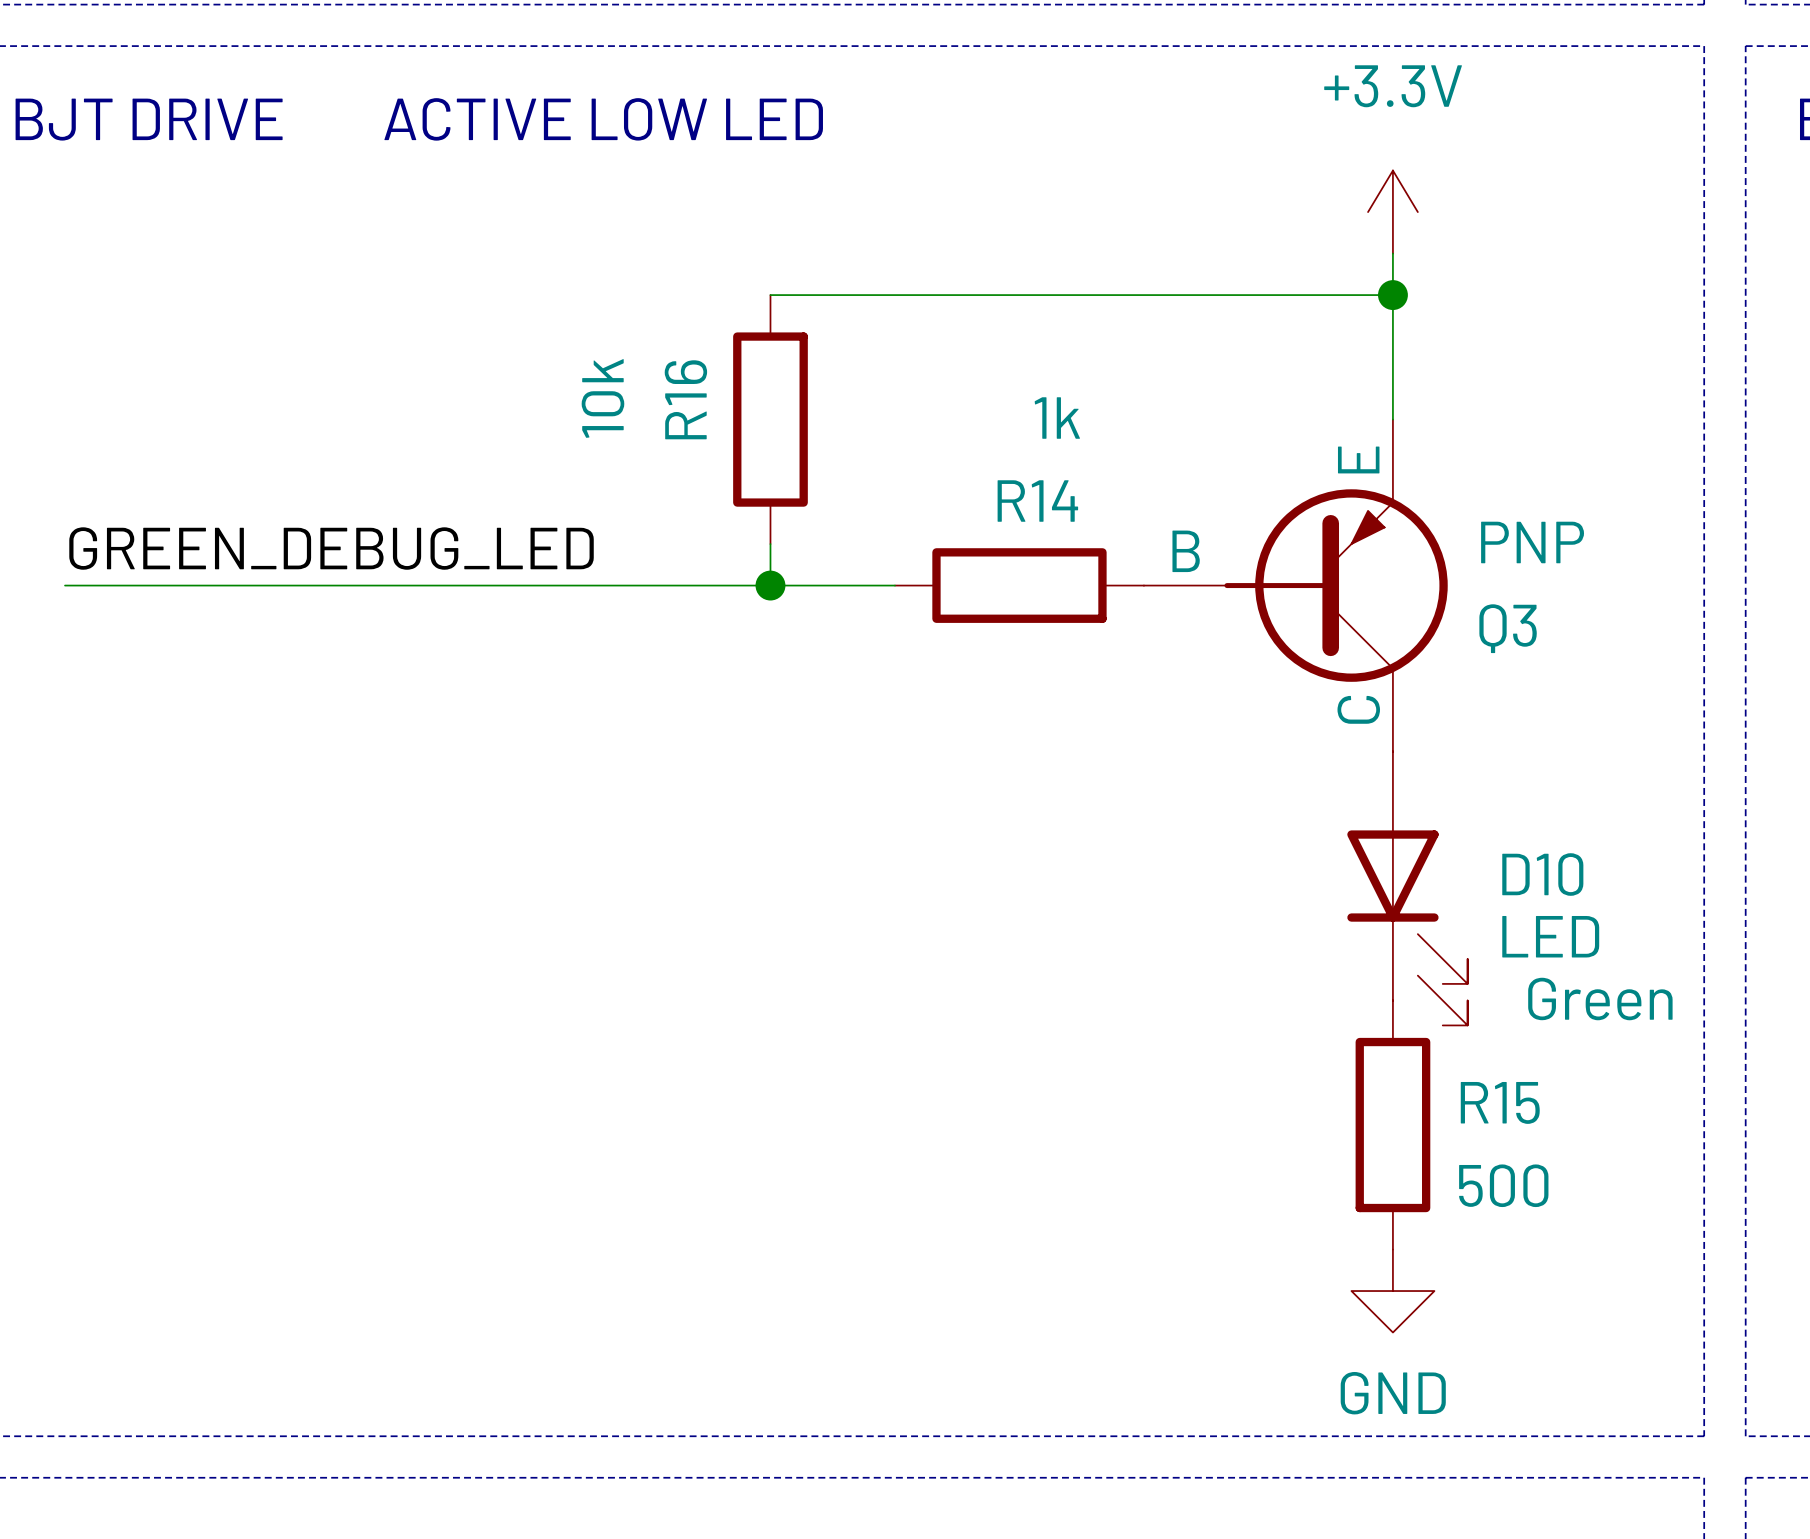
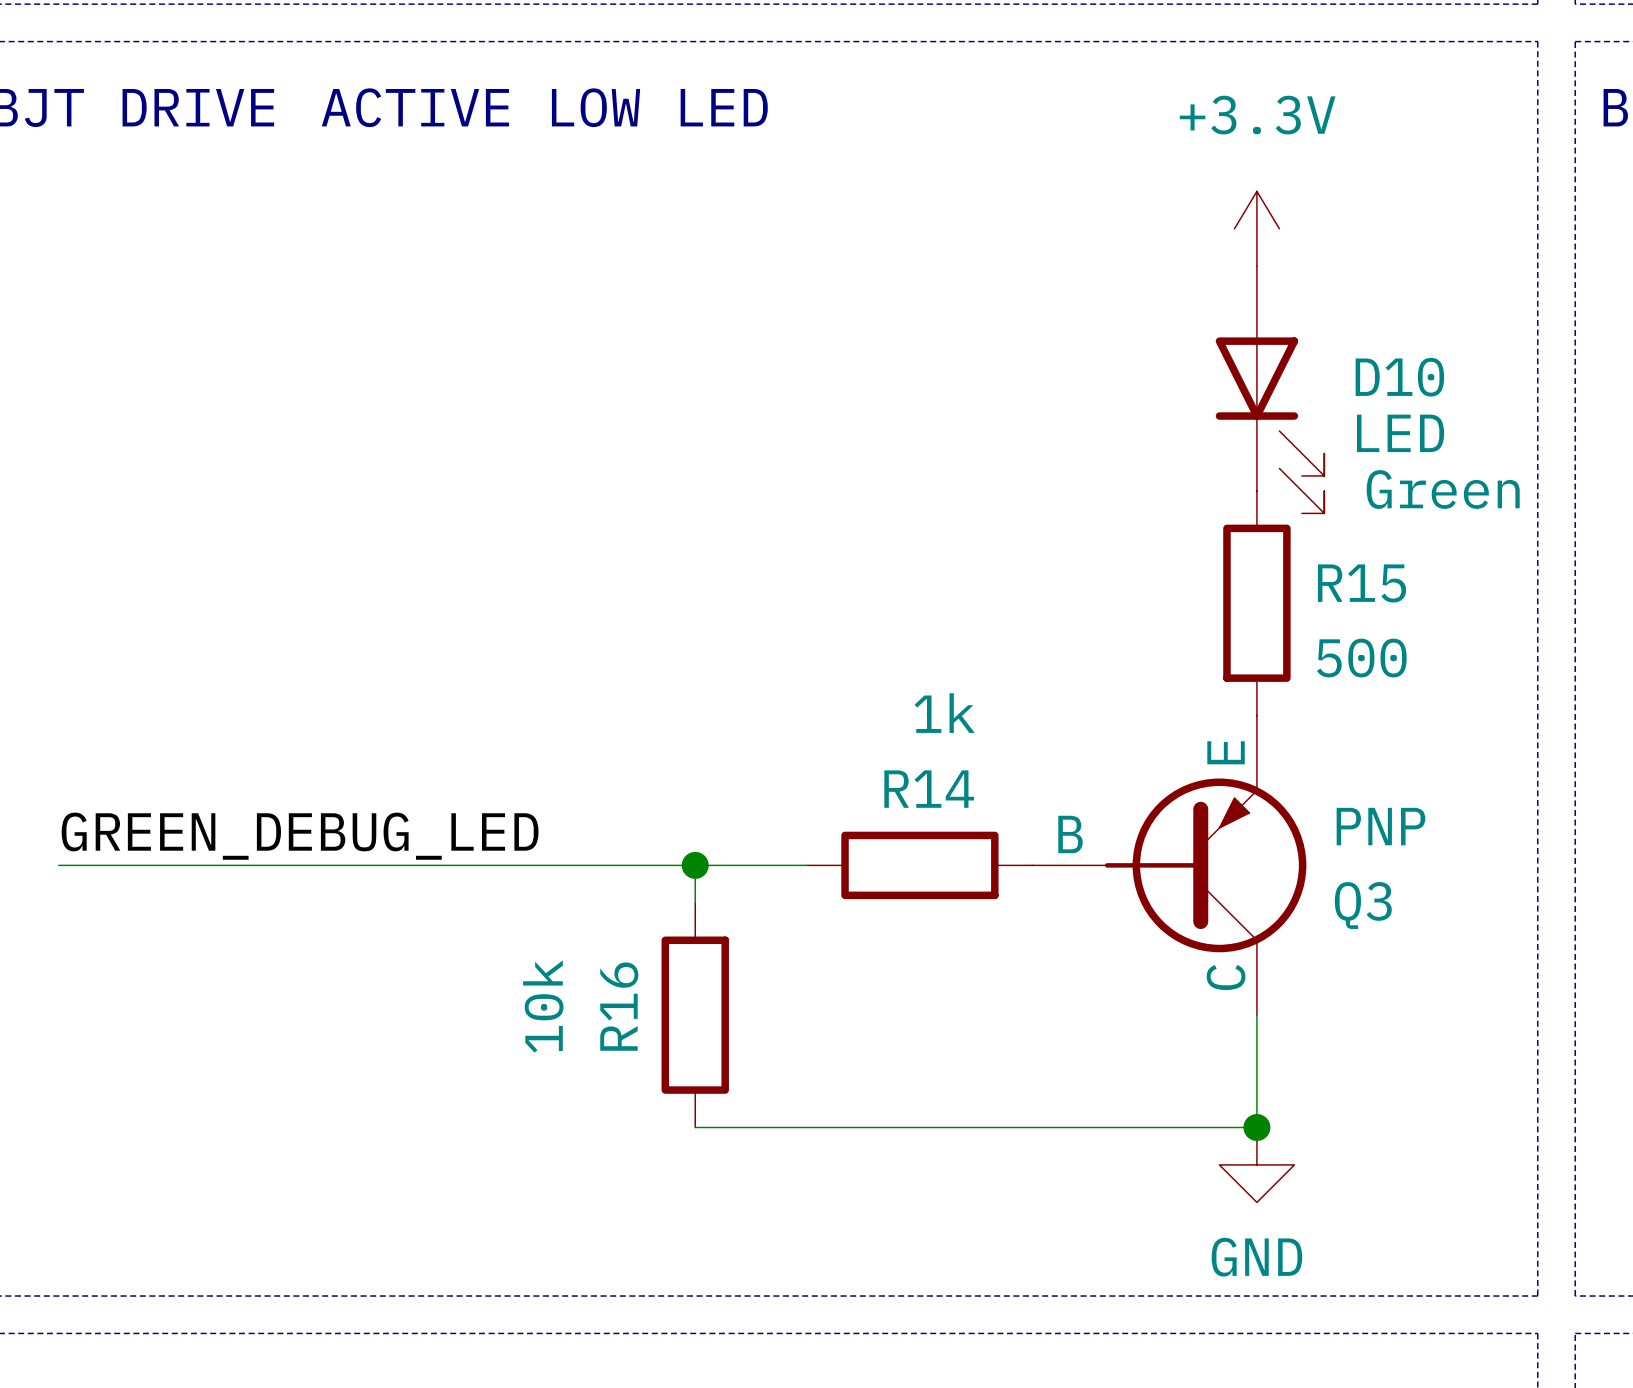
power symbol position: +3.3V (1392, 212) -> +3.3V (1256, 228)
wire: (770, 295) (1392, 295) -> none
junction: (1392, 295) -> none
R16 position: (770, 419) -> (695, 1015)
wire: (770, 544) (770, 585) -> (695, 865) (695, 902)
label position: GREEN_DEBUG_LED (331, 548) -> GREEN_DEBUG_LED (300, 836)
wire: (65, 585) (894, 585) -> (58, 865) (807, 865)
junction: (770, 585) -> none
R14 position: (1019, 585) -> (919, 865)
Q3 position: (1295, 585) -> (1169, 865)
D10 position: (1407, 888) -> (1270, 389)
junction: none -> (695, 865)
wire: none -> (1256, 1015) (1256, 1127) (695, 1127)
R15 position: (1392, 1125) -> (1256, 603)
junction: none -> (1256, 1127)

